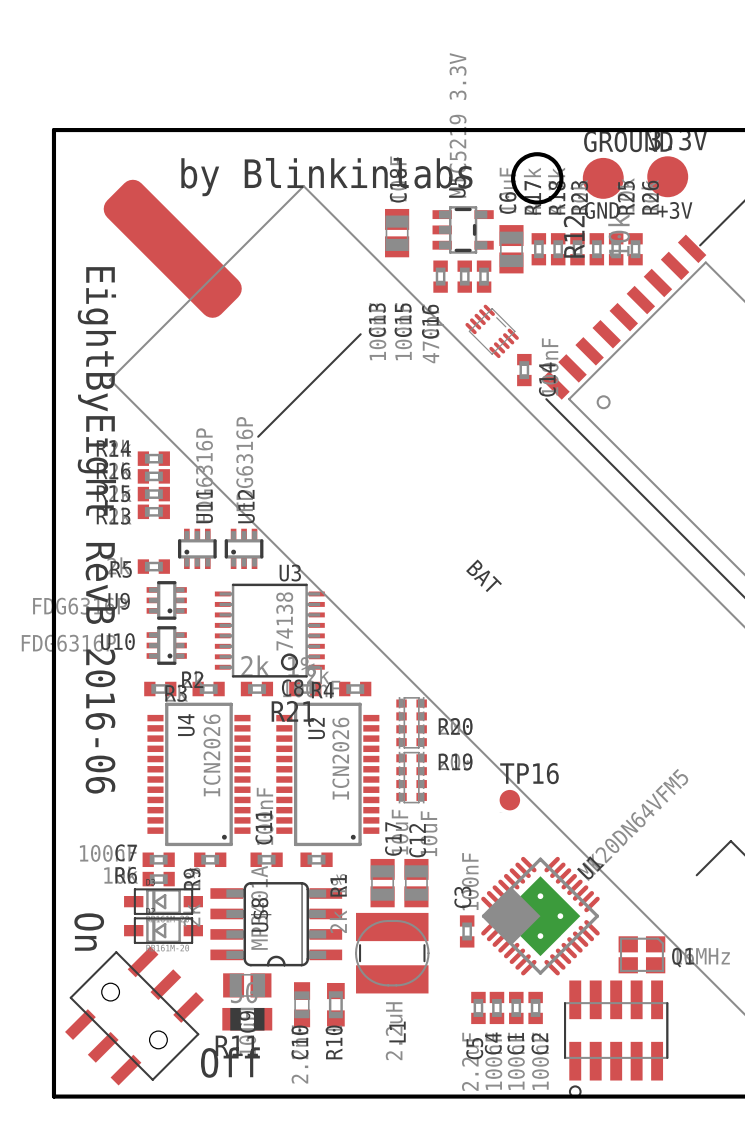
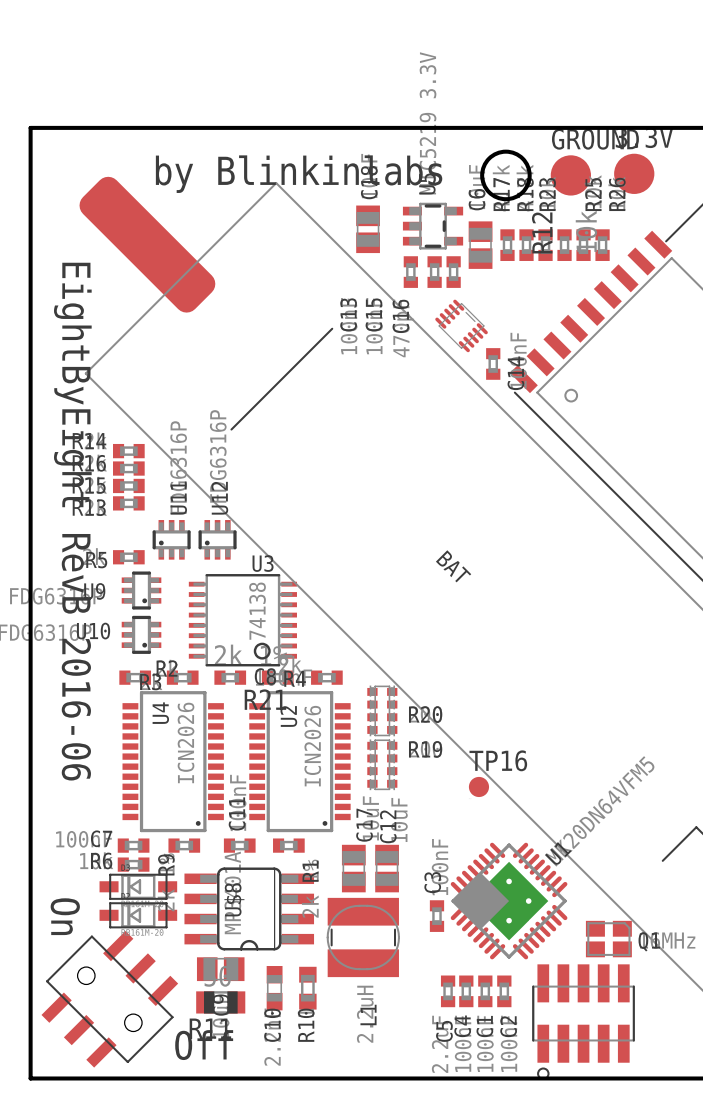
text: GND (602, 210) -> none
text: +3V (674, 210) -> none

